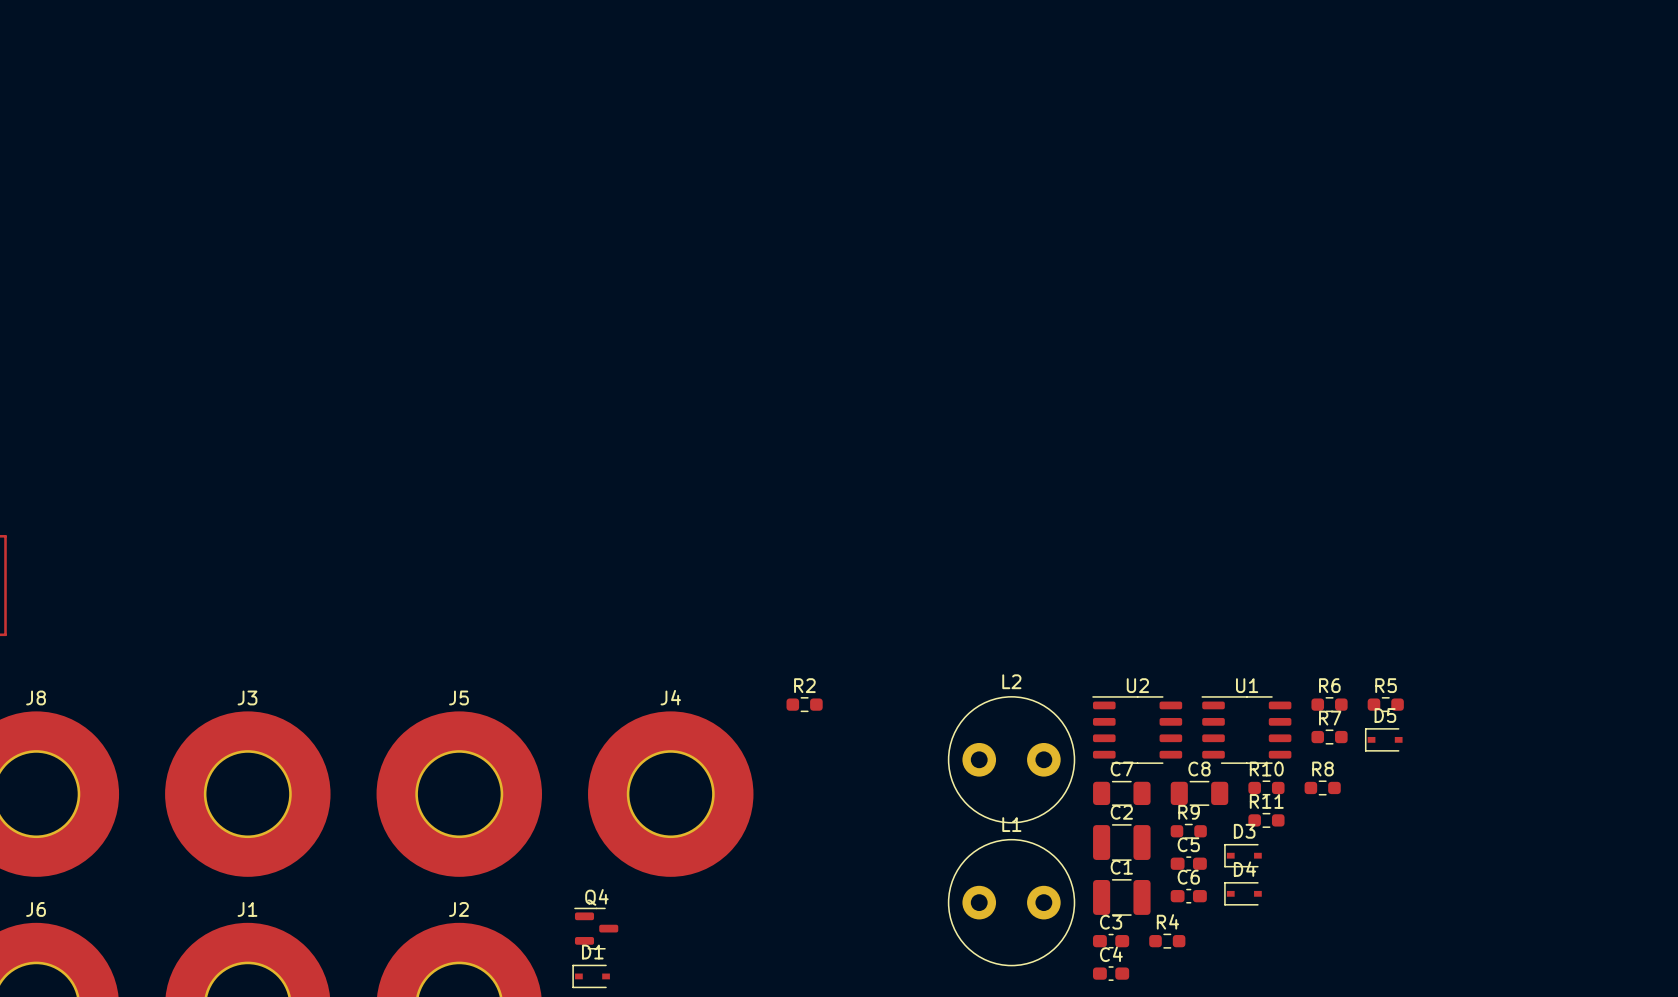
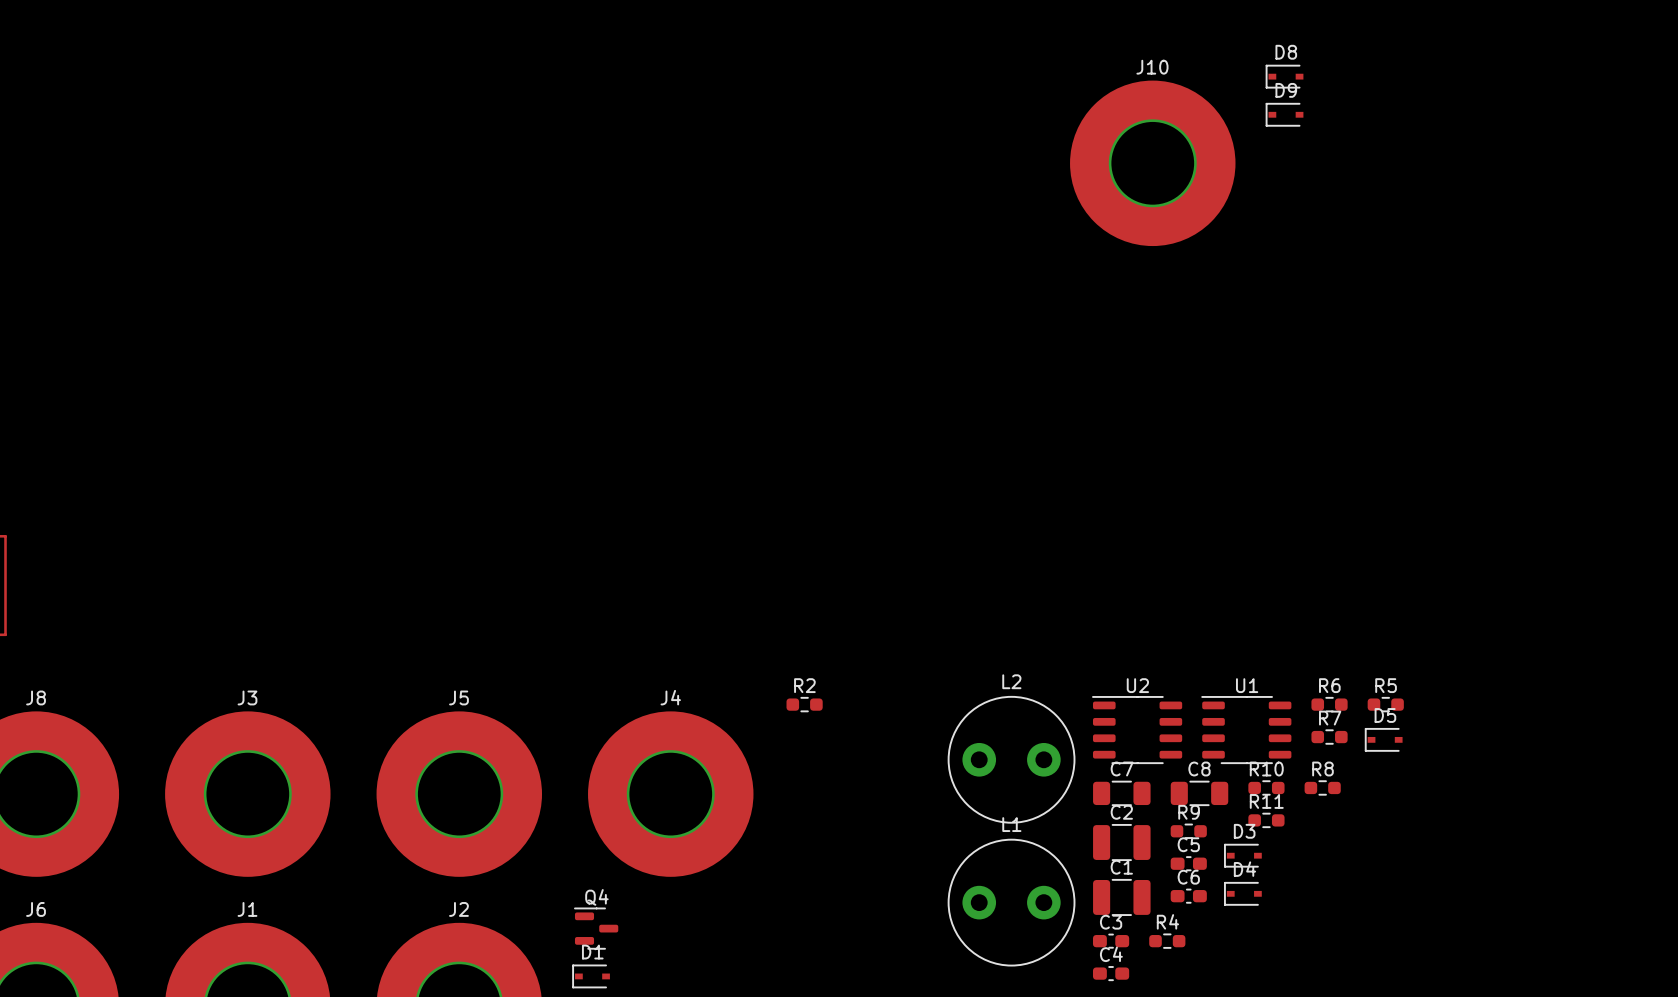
D8: none -> (1284, 76)
D9: none -> (1284, 114)
J10: none -> (1152, 163)

